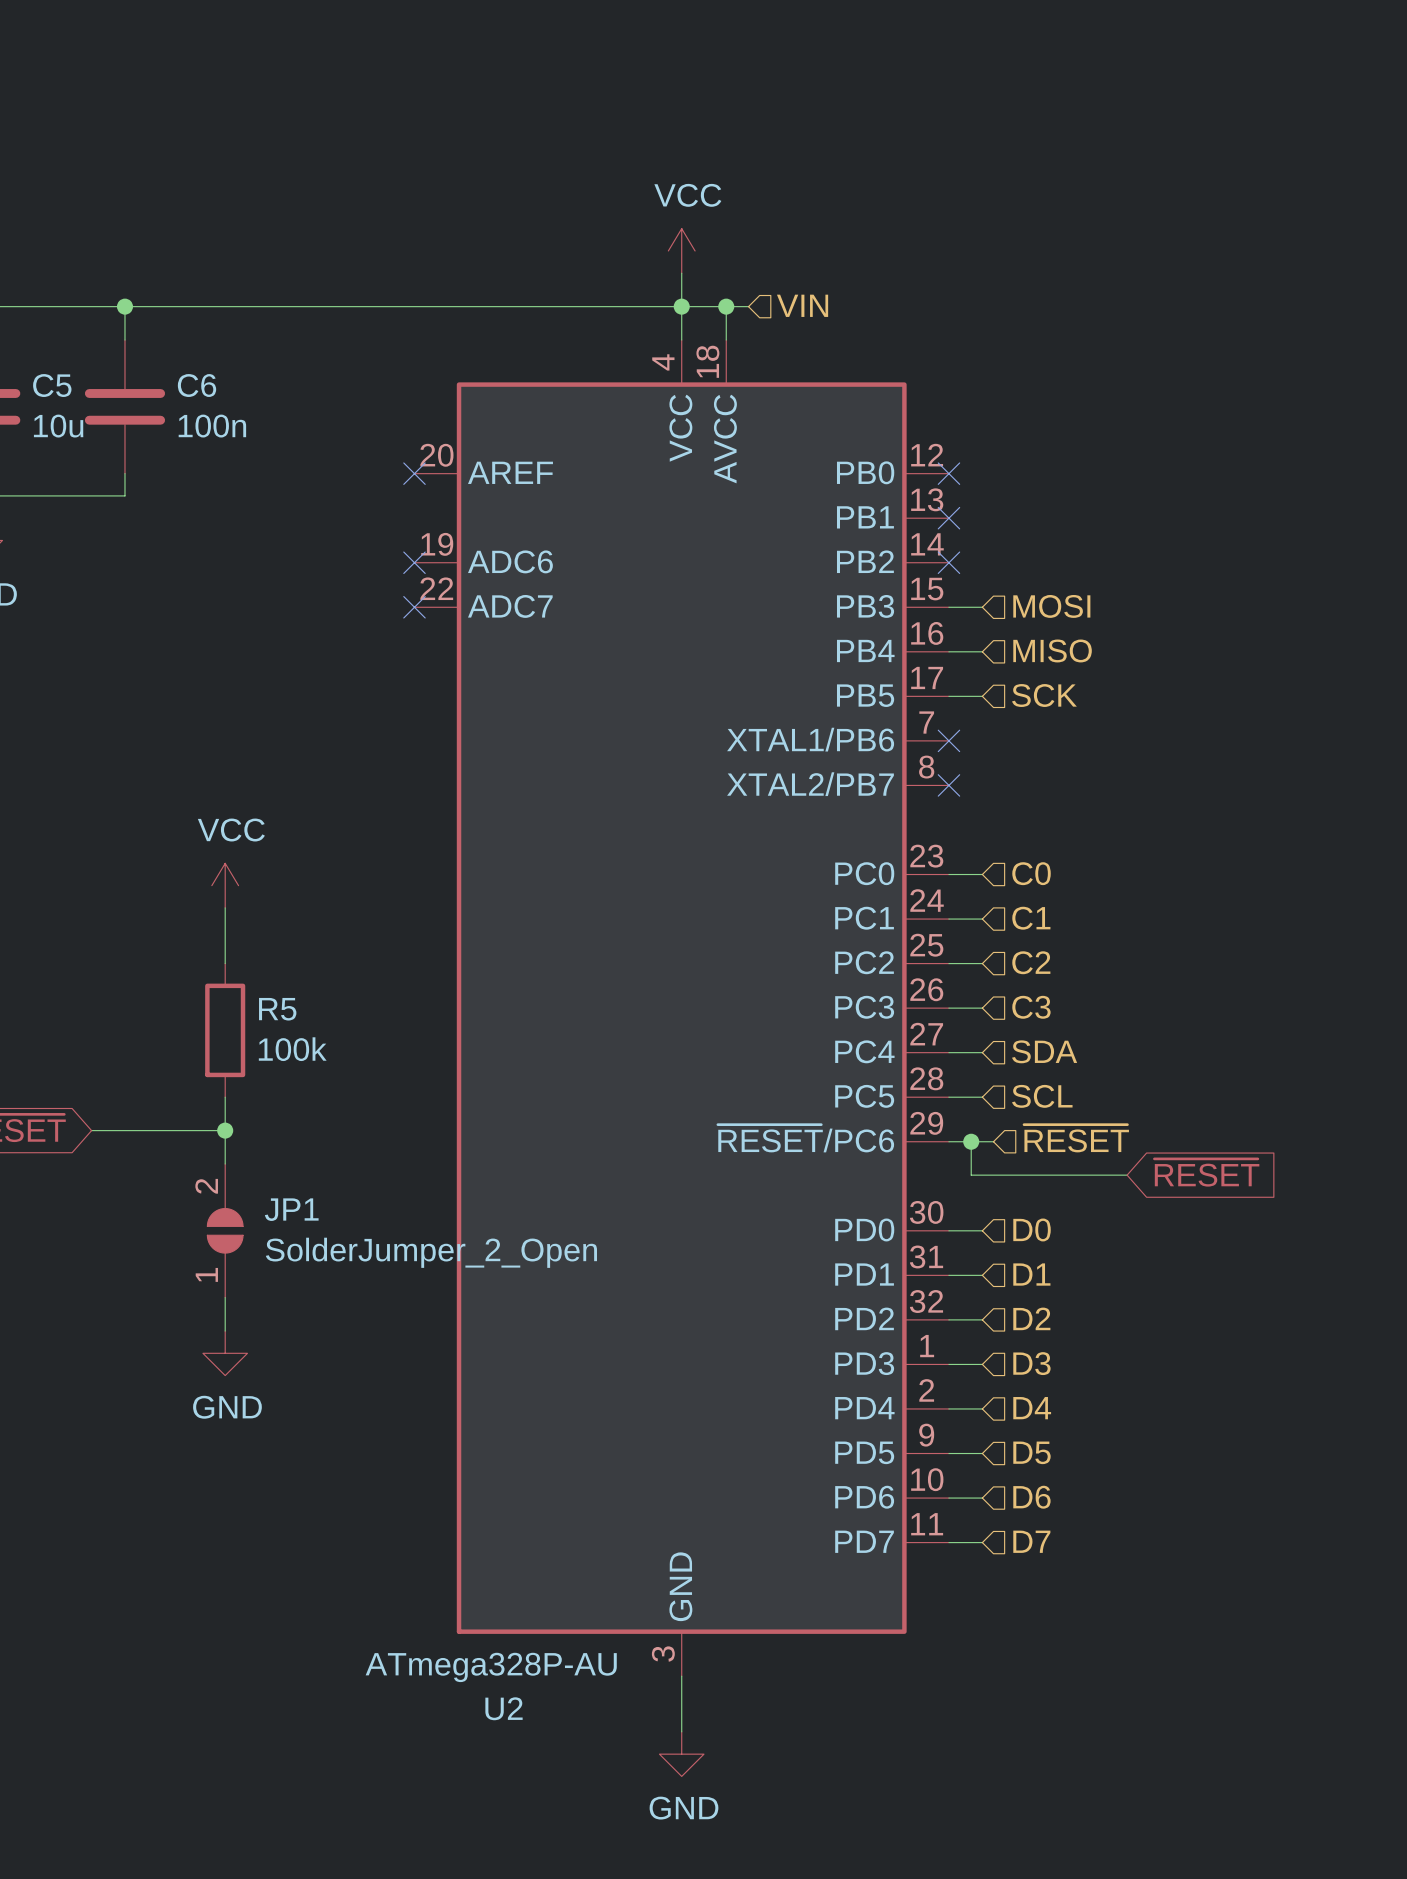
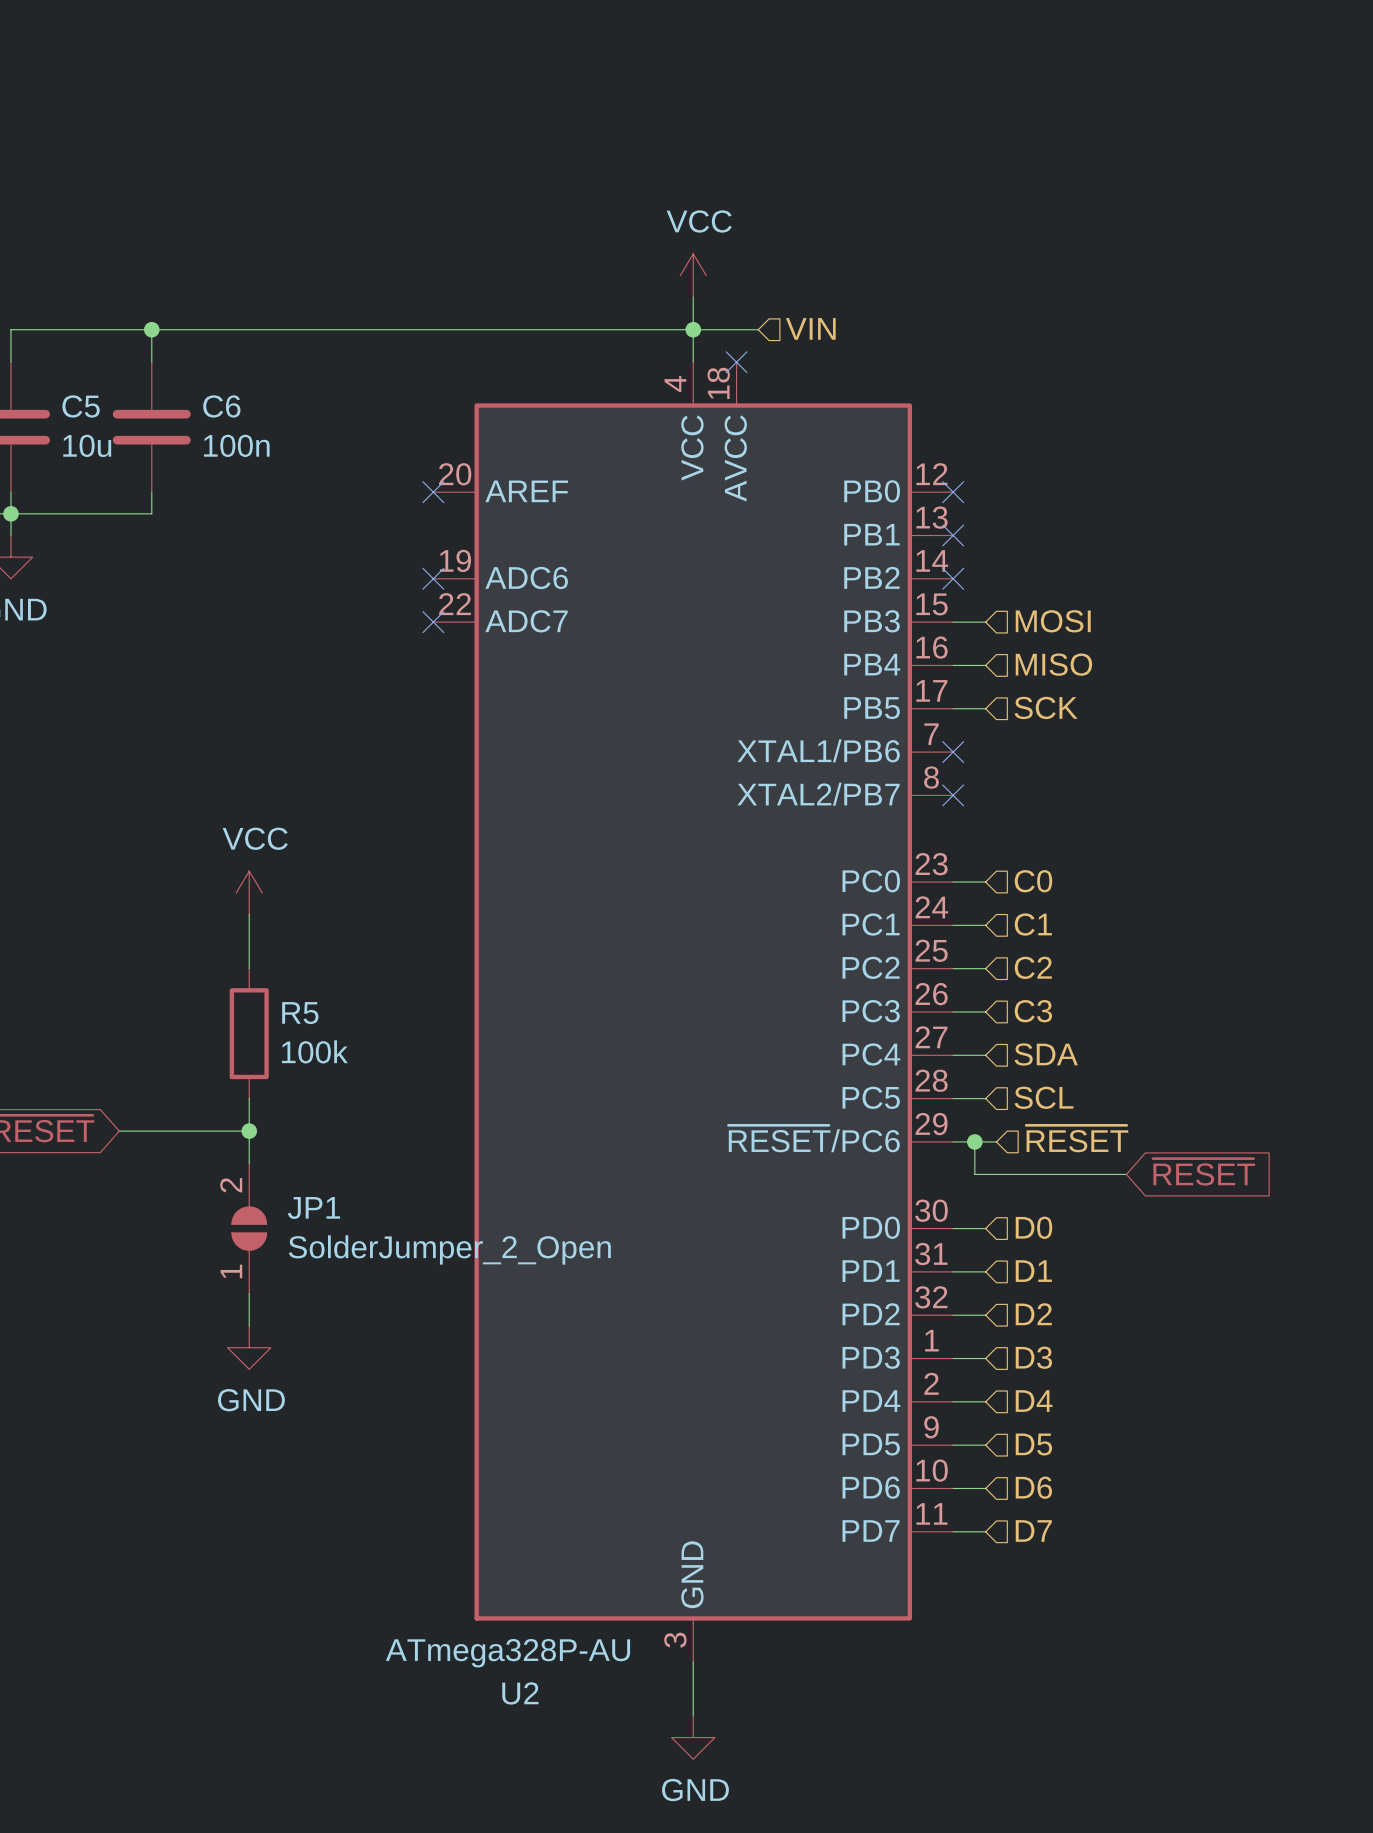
wire: (726, 306) (726, 340) -> none
junction: (726, 306) -> none
no-connect mark: none -> (736, 362)

